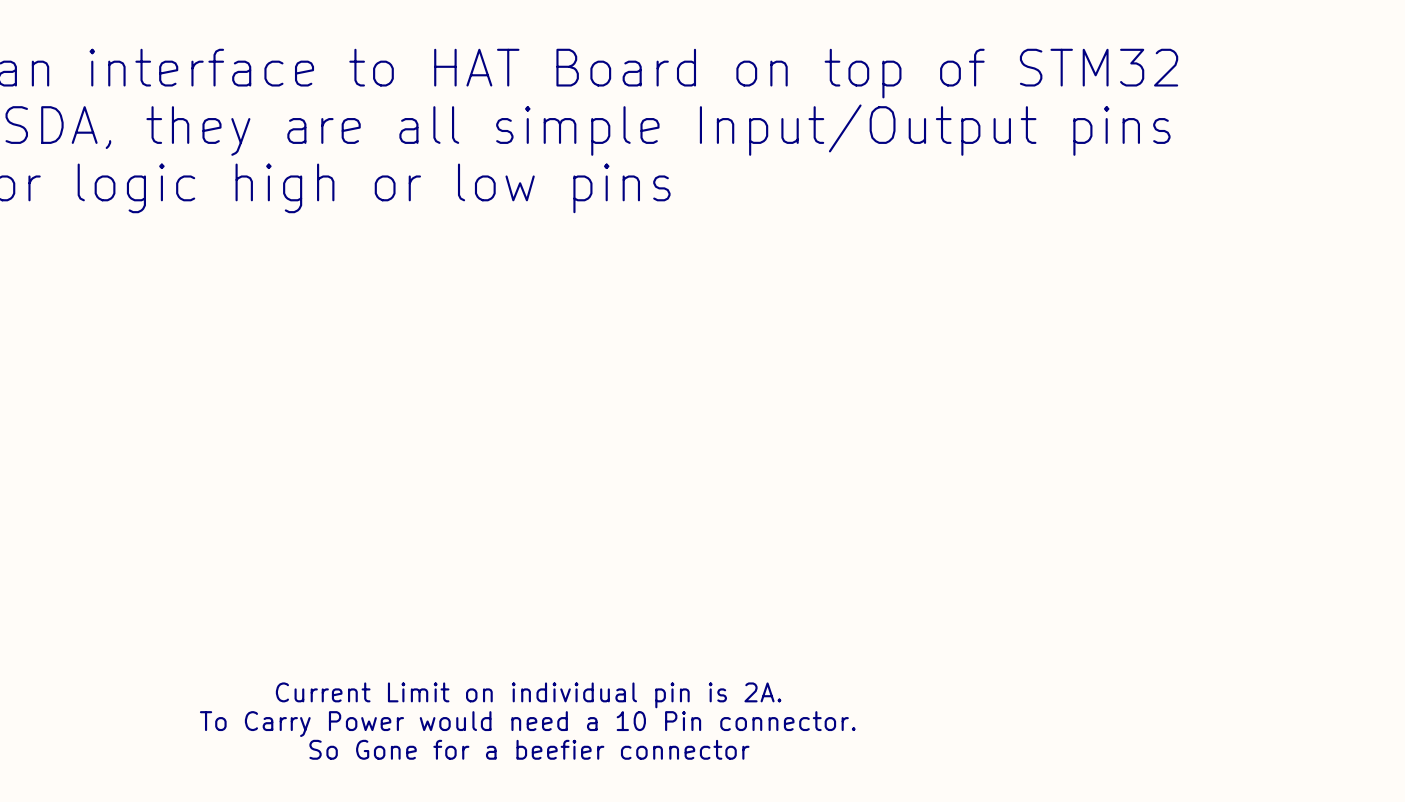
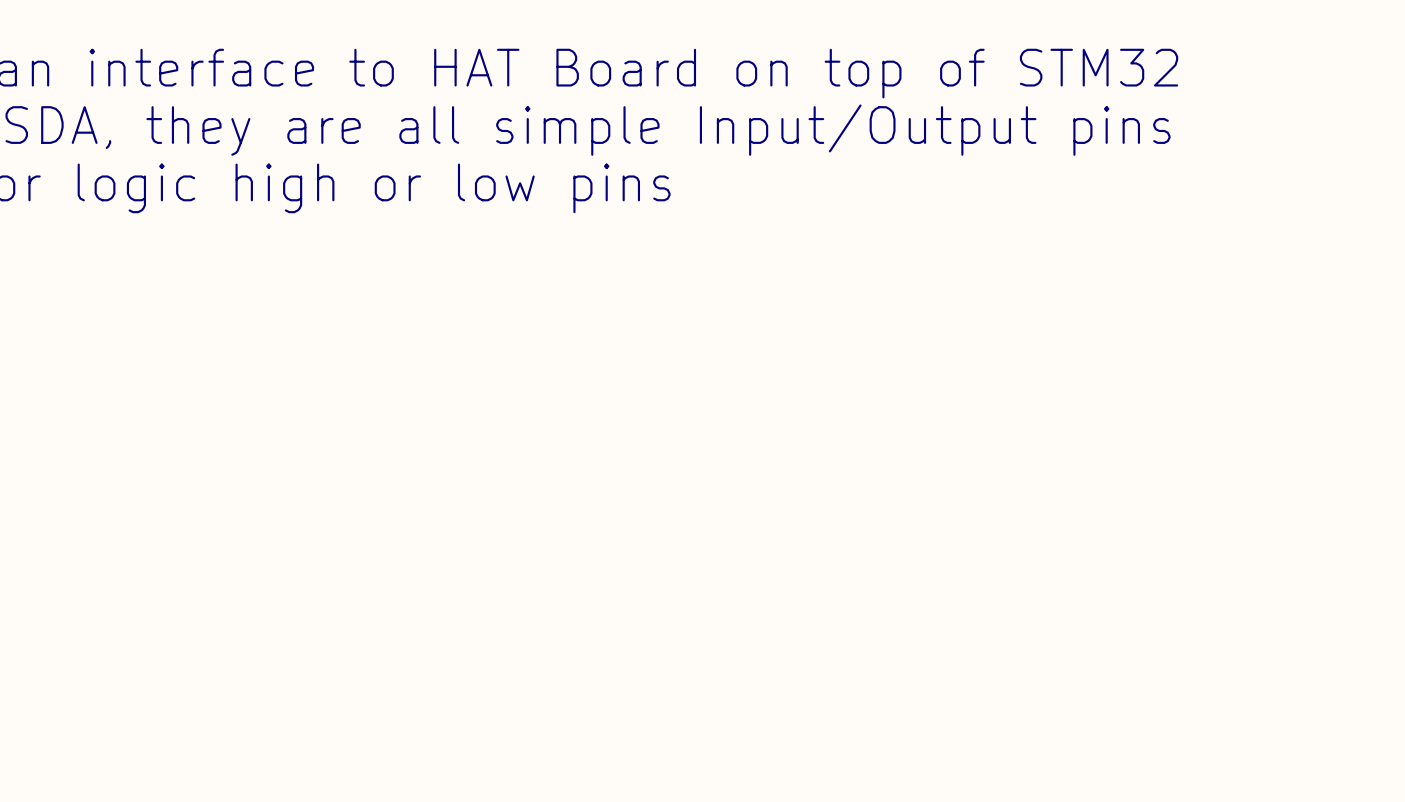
text: Current Limit on individual pin is 2A. (528, 695) -> none
text: To Carry Power would need a 10 Pin connector. (527, 724) -> none
text: So Gone for a beefier connector (529, 749) -> none

